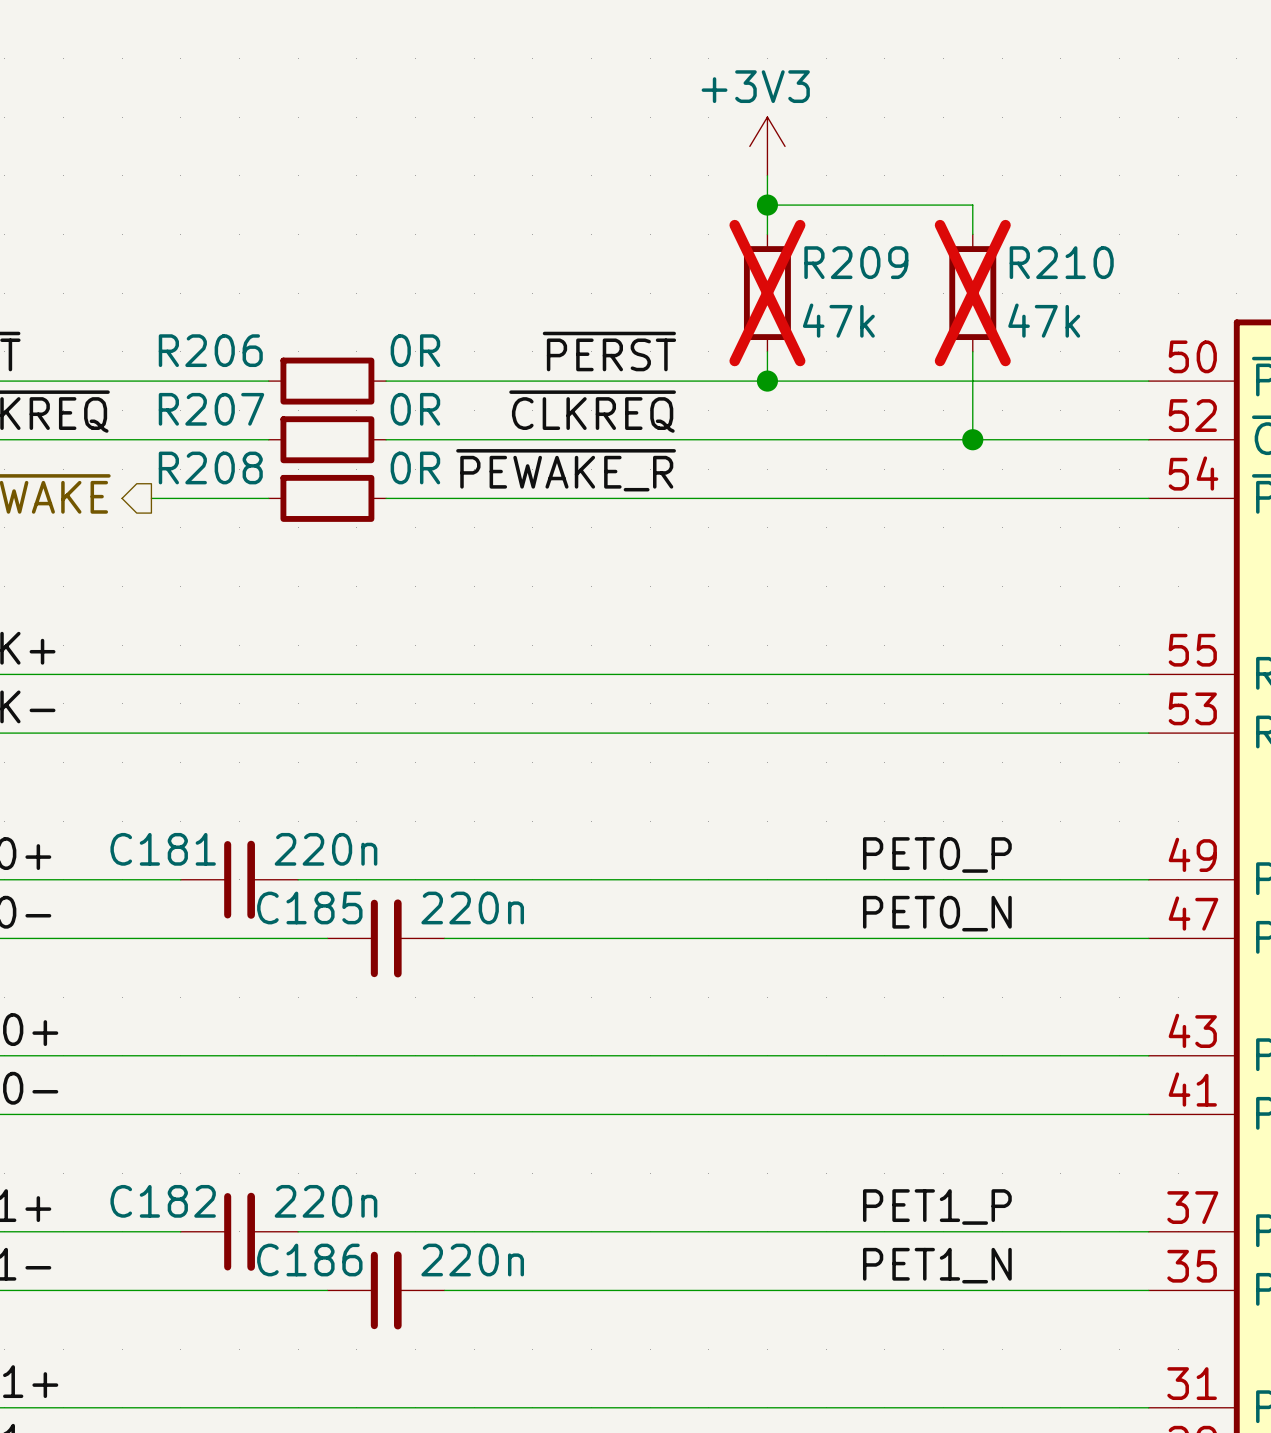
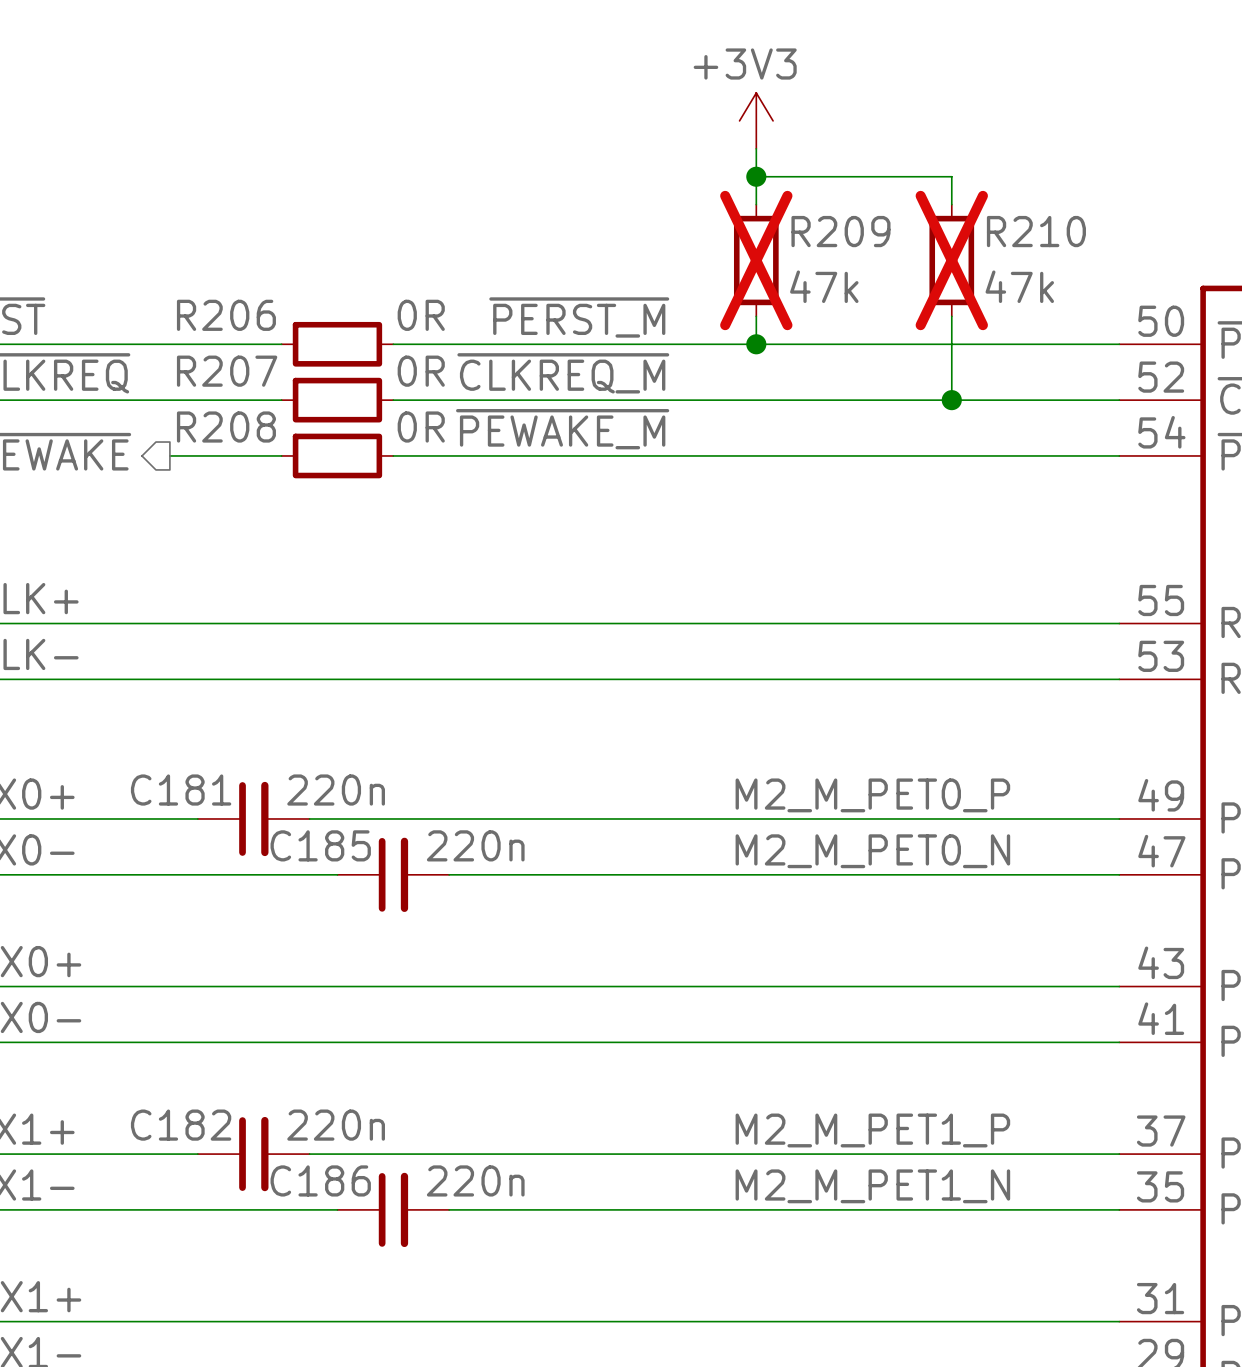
label: ~{PERST} (609, 351) -> ~{PERST_M} (579, 317)
label: ~{CLKREQ} (592, 411) -> ~{CLKREQ_M} (563, 373)
label: ~{PEWAKE_R} (566, 470) -> ~{PEWAKE_M} (562, 429)
label: PET0_P (937, 854) -> M2_M_PET0_P (872, 795)
label: PET0_N (937, 913) -> M2_M_PET0_N (872, 851)
label: PET1_P (937, 1206) -> M2_M_PET1_P (872, 1130)
label: PET1_N (937, 1265) -> M2_M_PET1_N (872, 1186)

